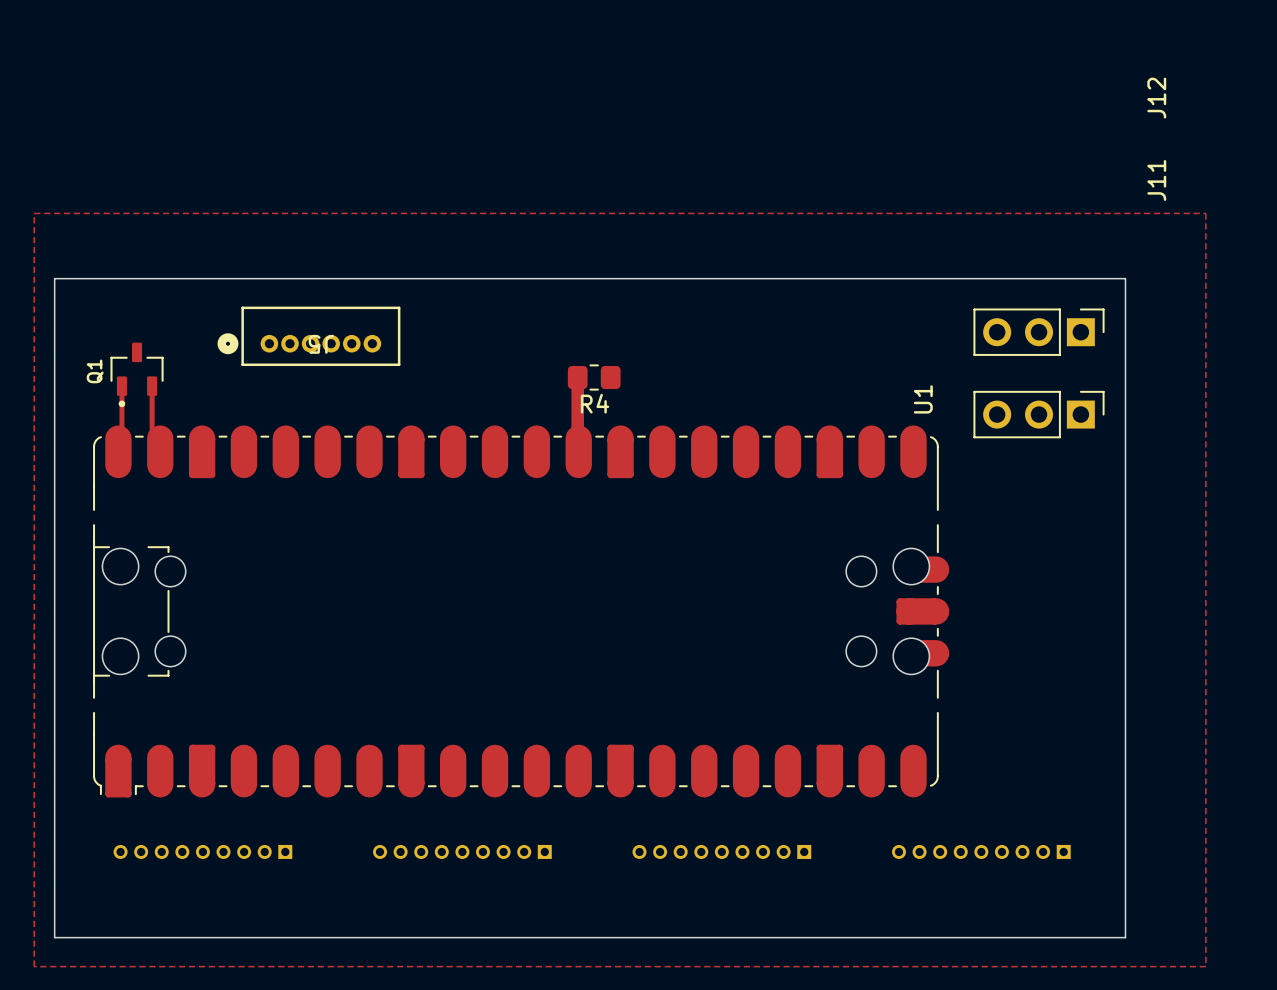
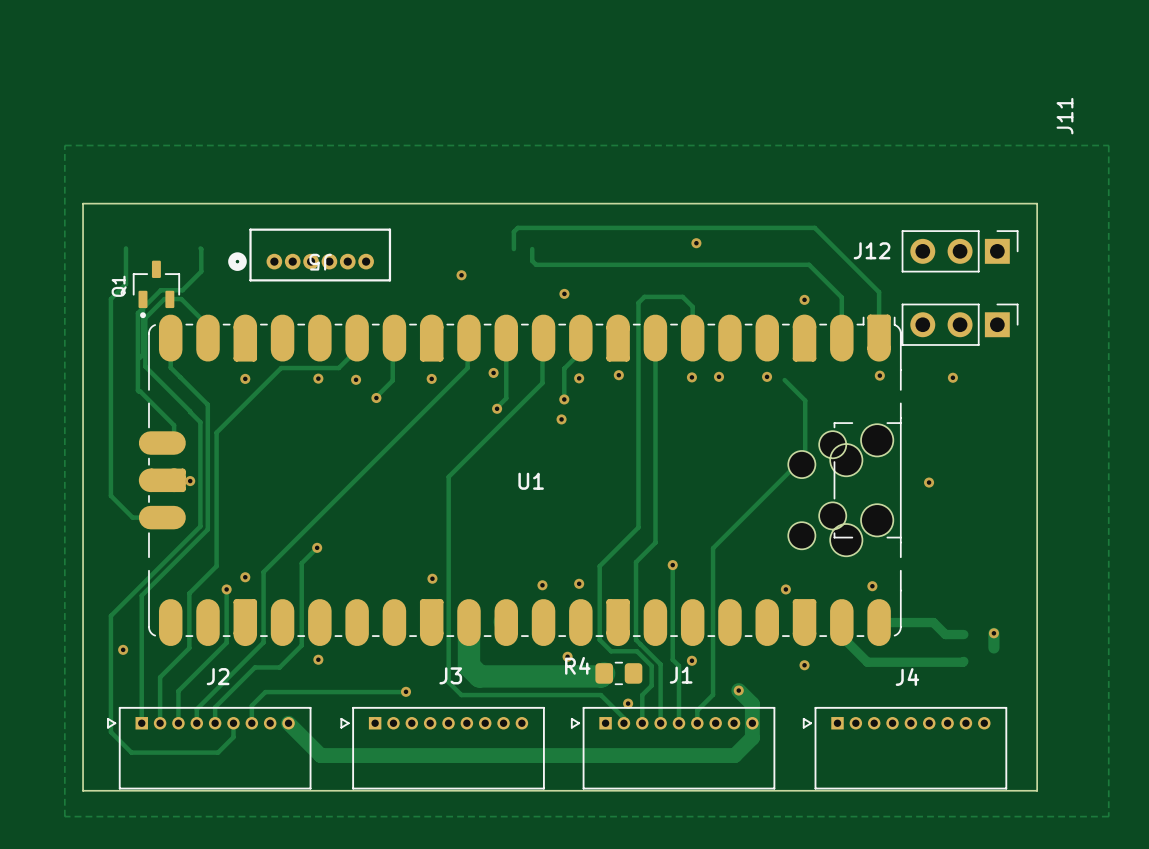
J12 name rotation: 0° (1156, 98) -> 90° clockwise (872, 250)
J12 name position: J12 (1156, 98) -> J12 (872, 250)
via: none -> (696, 243)
track: none -> (125, 248) (125, 283) (110, 299) (110, 495) (132, 517) (174, 517)
track: none -> (200, 248) (201, 271) (182, 290) (160, 290) (137, 313) (137, 390) (174, 425) (174, 443)
track: none -> (513, 249) (513, 231) (517, 227) (814, 227) (879, 292) (879, 338)
track: none -> (532, 249) (532, 260) (536, 264) (809, 264) (841, 297) (841, 338)
via: none -> (461, 275)
track: (577, 377) (578, 451) -> none
R4 position: (594, 377) -> (618, 673)
via: none -> (564, 293)
track: (152, 386) (152, 443) (160, 451) -> none
via: none -> (804, 299)
U1 name position: U1 (923, 399) -> U1 (531, 481)
R4 name position: R4 (594, 403) -> R4 (577, 665)
track: none -> (467, 335) (467, 368) (263, 572) (263, 642) (196, 709) (196, 723)
track: none -> (356, 337) (356, 350) (338, 368) (281, 368) (216, 432) (216, 566) (189, 593) (189, 648) (160, 677) (160, 723)
track: none -> (392, 337) (392, 380) (376, 397)
track: none -> (170, 338) (170, 367) (207, 404) (207, 529) (141, 595) (141, 723)
track: none -> (208, 338) (208, 325) (181, 299) (164, 299) (145, 318) (145, 366) (200, 422) (200, 526) (110, 615) (110, 732) (131, 752) (218, 752) (233, 737) (233, 723)
track: none -> (506, 338) (506, 398) (497, 408)
track: none -> (692, 338) (692, 306) (682, 296) (644, 296) (638, 302) (638, 527) (599, 566) (599, 639) (611, 651) (636, 651) (651, 665) (651, 685) (642, 695) (642, 723)
track: none -> (542, 338) (542, 383) (448, 476) (448, 681)
track: none -> (580, 338) (580, 352) (564, 368) (564, 399)
track: none -> (655, 338) (655, 542) (636, 562) (636, 639) (660, 664) (660, 723)
via: none -> (493, 372)
via: none -> (618, 375)
via: none -> (879, 375)
via: none -> (691, 377)
via: none -> (719, 376)
via: none -> (767, 376)
via: none -> (579, 378)
via: none -> (952, 377)
via: none -> (245, 378)
via: none -> (318, 378)
via: none -> (431, 378)
via: none -> (356, 379)
track: none -> (784, 380) (805, 400) (805, 456) (713, 548) (713, 694) (697, 710) (697, 723)
via: none -> (376, 397)
via: none -> (564, 399)
via: none -> (497, 408)
via: none -> (561, 419)
via: none -> (190, 481)
via: none -> (929, 482)
U1 rotation: 0° (521, 611) -> 180° (520, 480)
via: none -> (317, 547)
track: none -> (317, 547) (301, 563) (301, 645) (279, 667) (254, 667) (215, 707) (215, 723)
track: none -> (673, 564) (672, 659) (678, 666) (678, 723)
via: none -> (672, 565)
via: none -> (245, 577)
via: none -> (432, 578)
via: none -> (579, 583)
via: none -> (542, 585)
via: none -> (872, 586)
track: none -> (226, 589) (226, 642) (178, 691) (178, 723)
via: none -> (226, 589)
via: none -> (785, 589)
track: none -> (468, 622) (468, 665) (479, 676) (601, 676) (604, 673)
track: none -> (841, 622) (841, 636) (867, 662) (963, 661)
track: none -> (879, 622) (933, 622) (945, 634) (963, 634)
track: none -> (993, 633) (993, 647)
via: none -> (993, 633)
via: none -> (123, 649)
via: none -> (567, 656)
via: none -> (318, 659)
via: none -> (691, 660)
via: none -> (804, 665)
track: none -> (448, 682) (461, 695) (600, 695) (623, 718) (623, 723)
track: none -> (738, 690) (752, 704) (752, 737) (734, 755) (320, 755) (288, 723)
via: none -> (738, 690)
track: none -> (406, 691) (265, 692) (251, 705) (251, 723)
via: none -> (406, 691)
via: none -> (628, 703)
part: (202, 851) -> none
J3 side: bottom (462, 851) -> top (442, 748)
part: (721, 851) -> none
J1 side: bottom (981, 851) -> top (673, 748)
J2: none -> (209, 748)
J4: none -> (905, 748)

